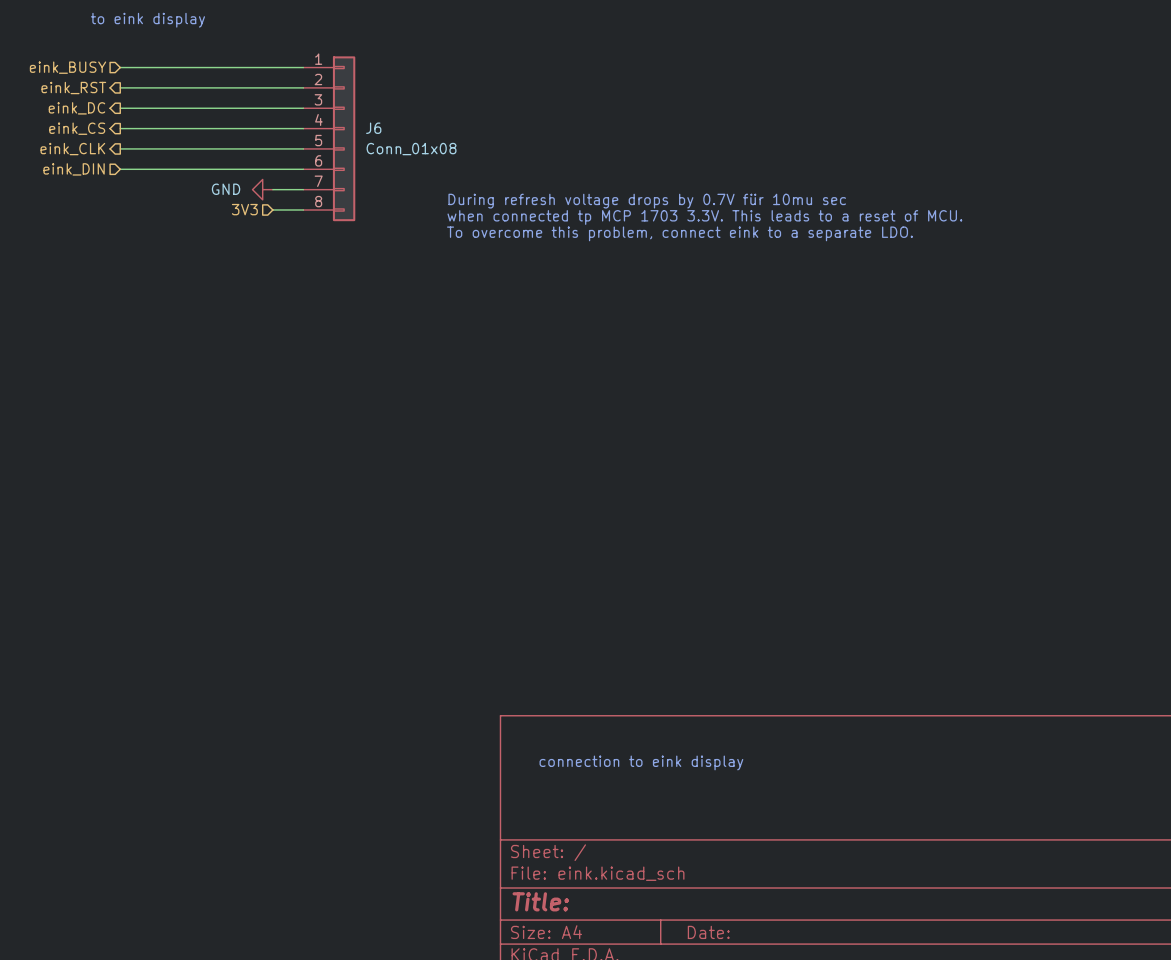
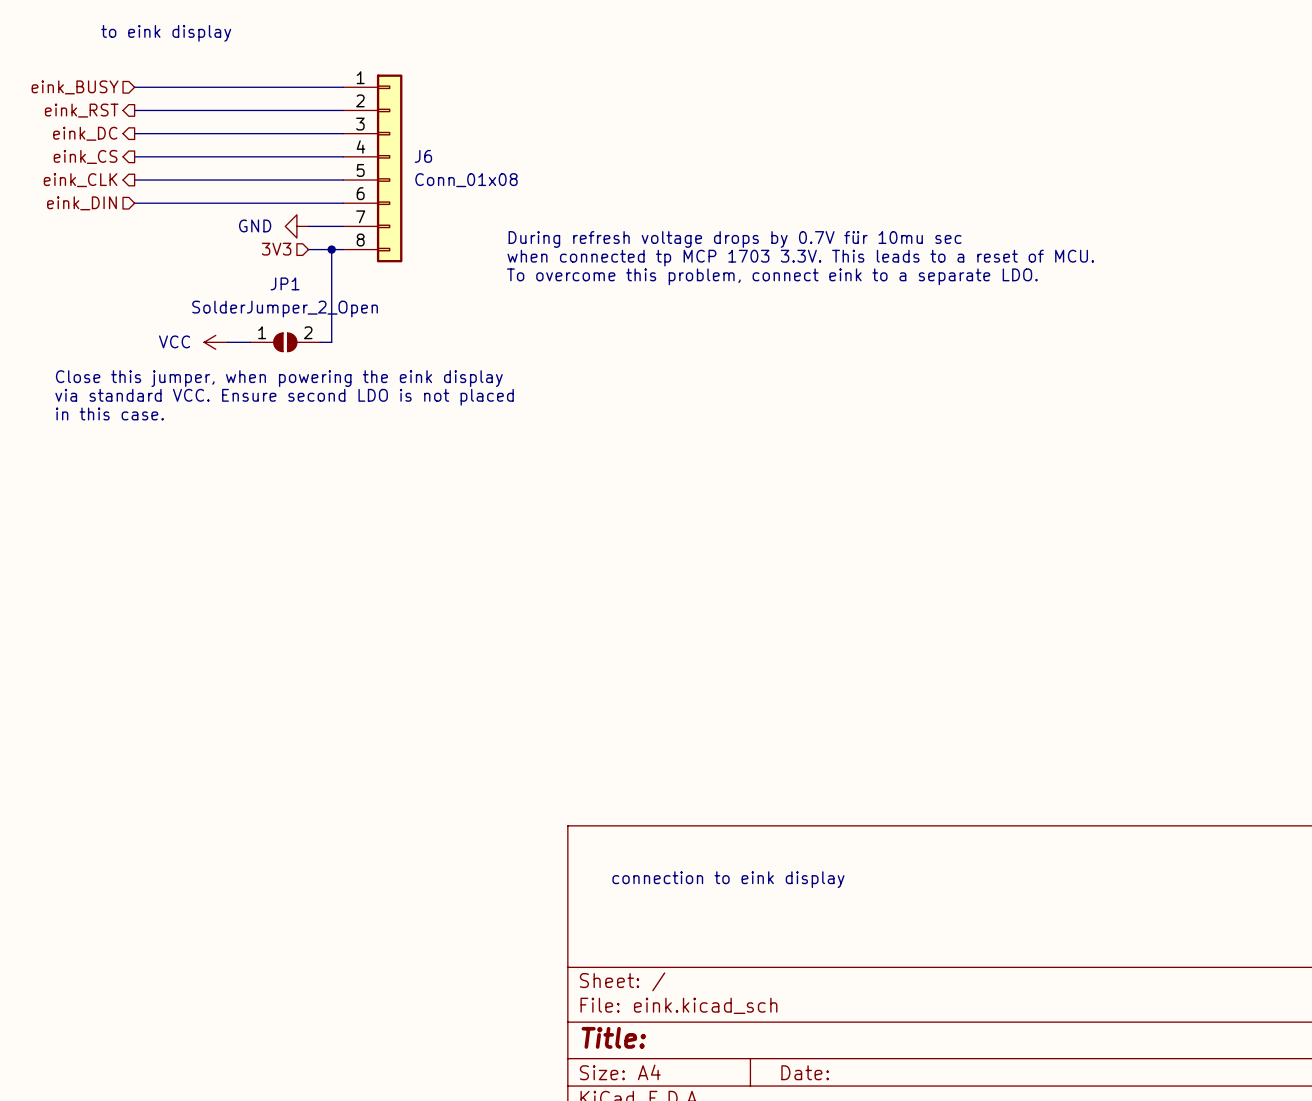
wire: none -> (331, 249) (331, 342) (320, 342)
junction: none -> (331, 249)
power symbol: none -> VCC (215, 342)
wire: none -> (227, 342) (250, 342)
JP1: none -> SolderJumper_2_Open (285, 342)
text: none -> Close this jumper, when powering the eink display (279, 378)
text: none -> via standard VCC. Ensure second LDO is not placed (284, 397)
text: none -> in this case. (109, 413)

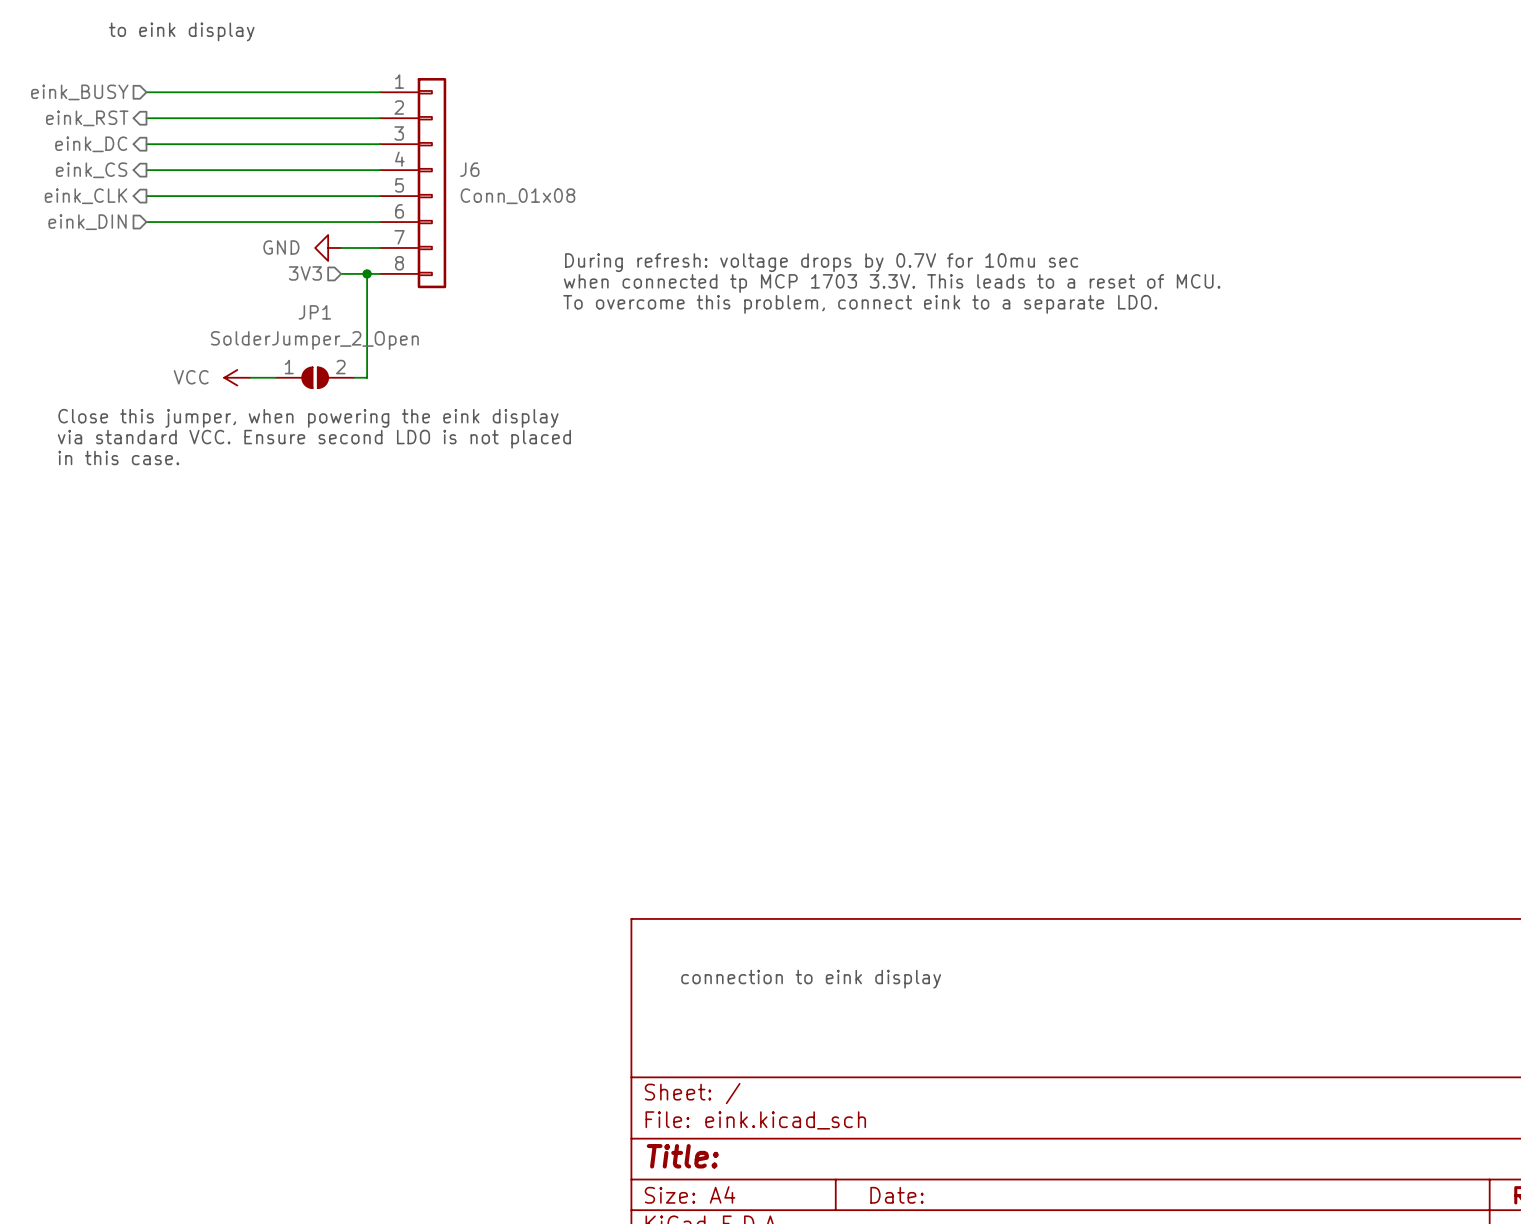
text: During refresh voltage drops by 0.7V für 10mu sec (735, 239) -> During refresh: voltage drops by 0.7V for 10mu sec (821, 262)

